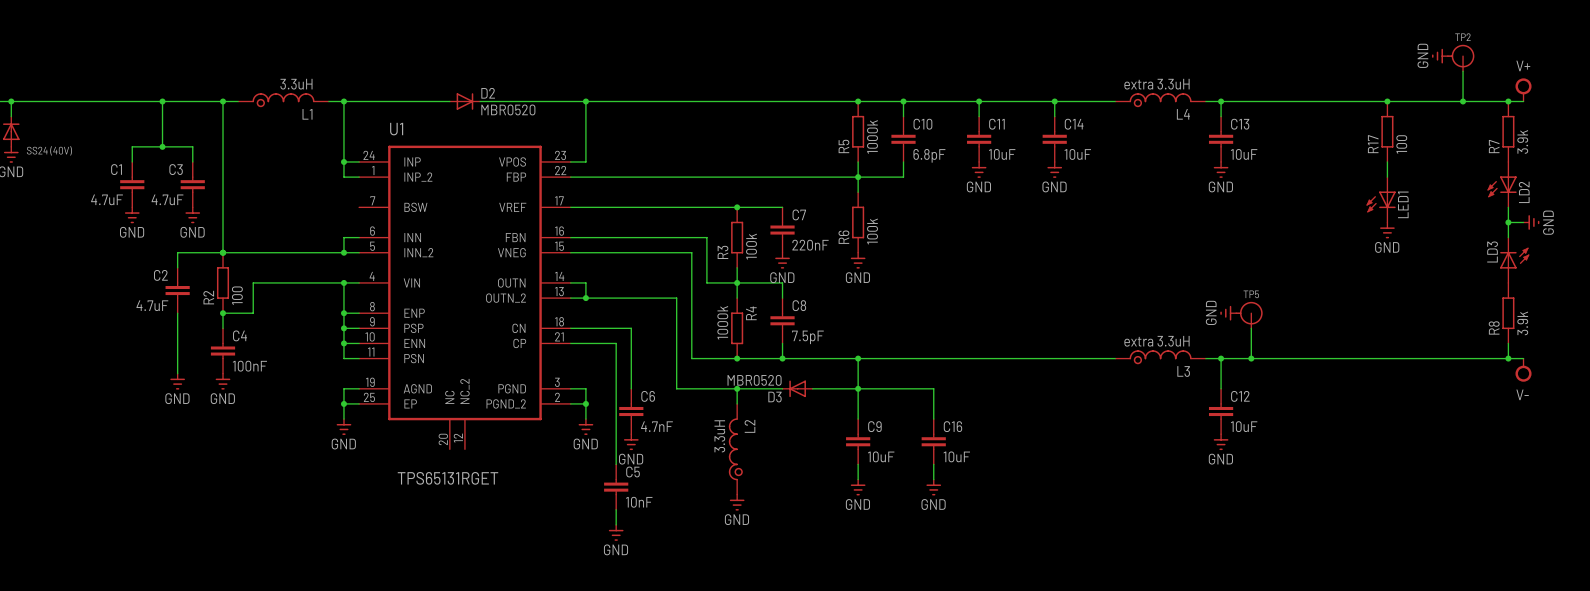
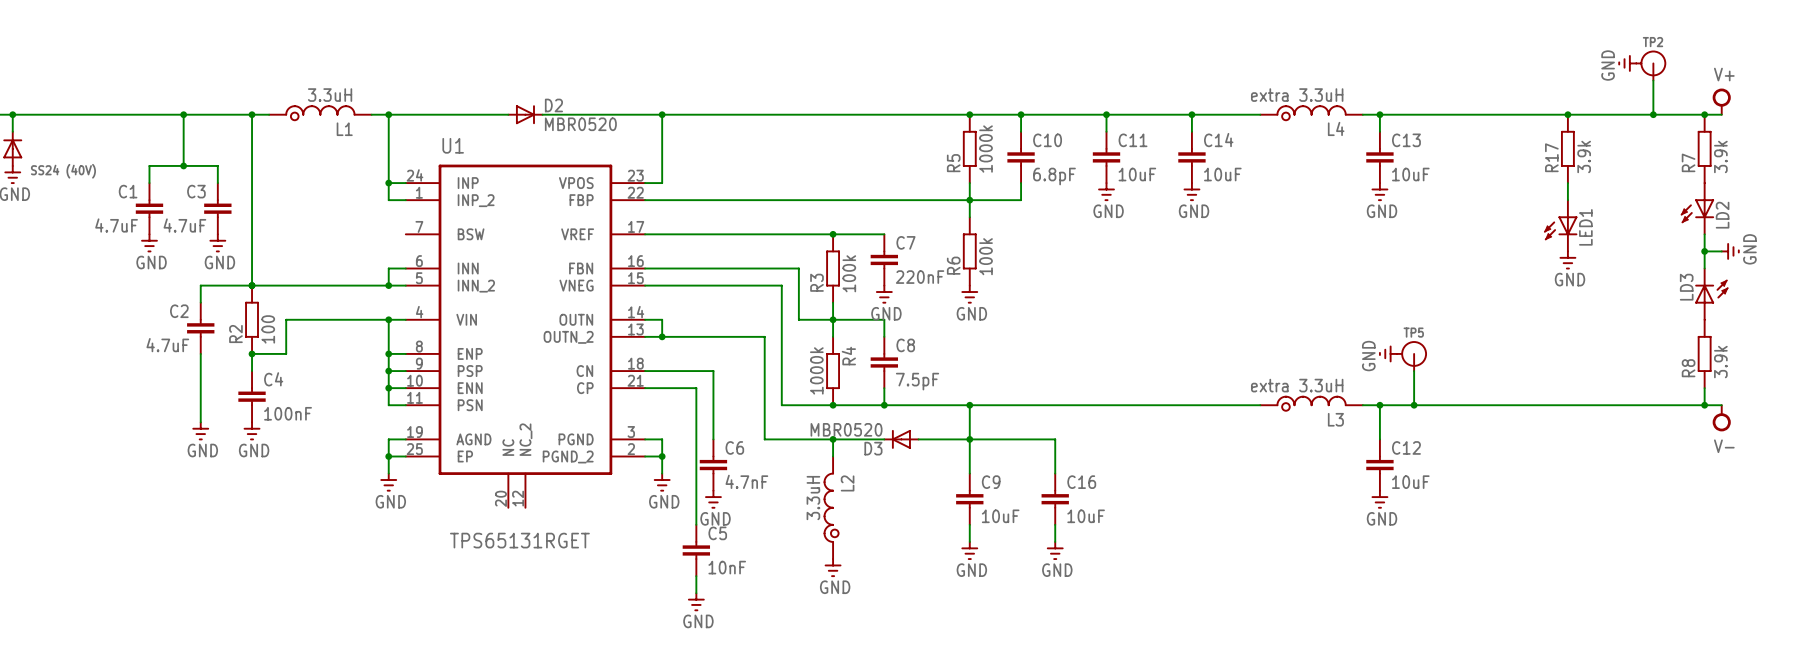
R17 value: 100 (1401, 144) -> 3.9k (1584, 156)

